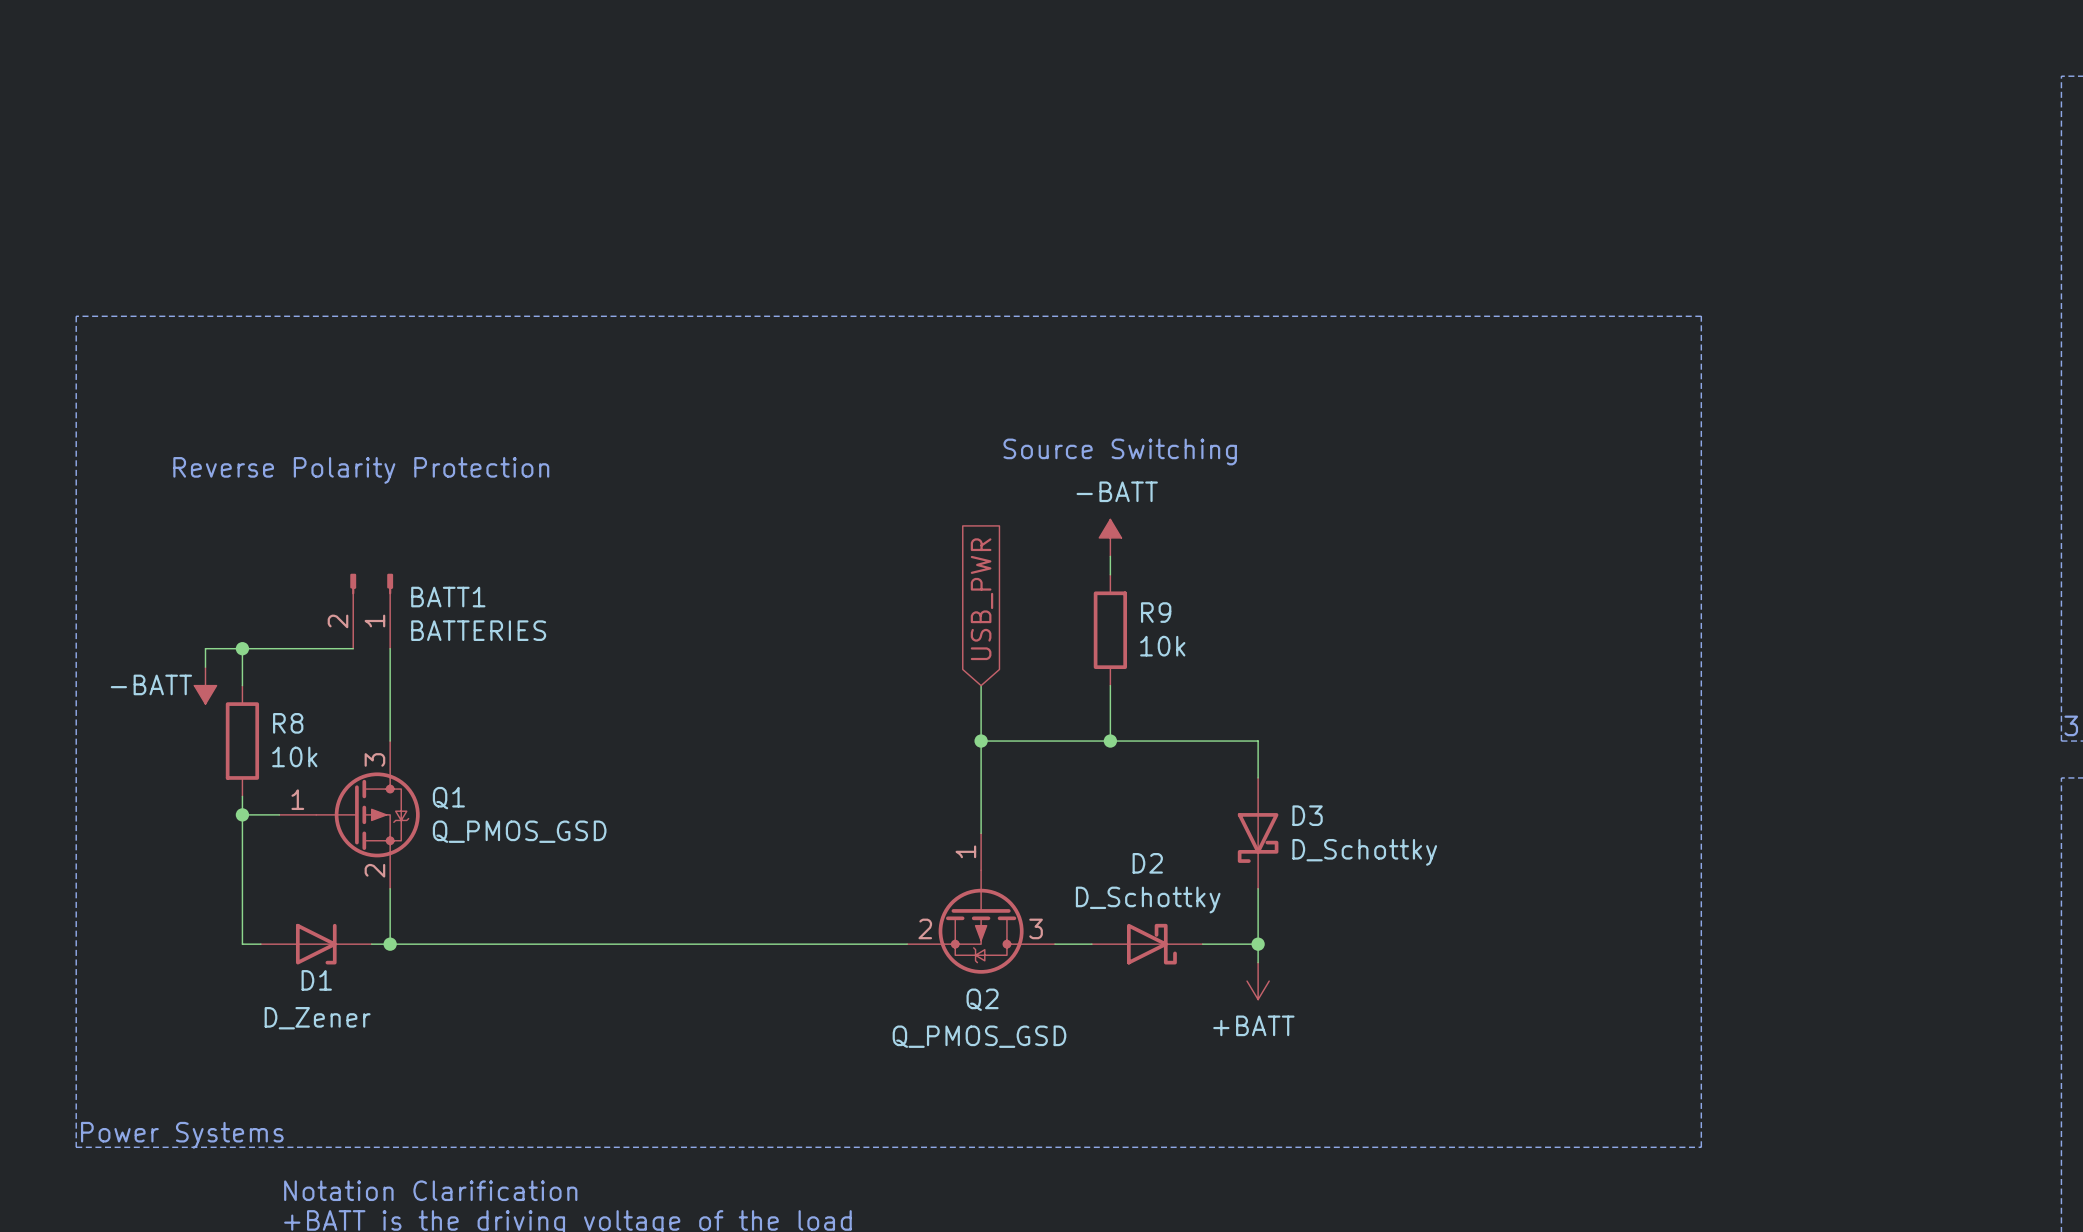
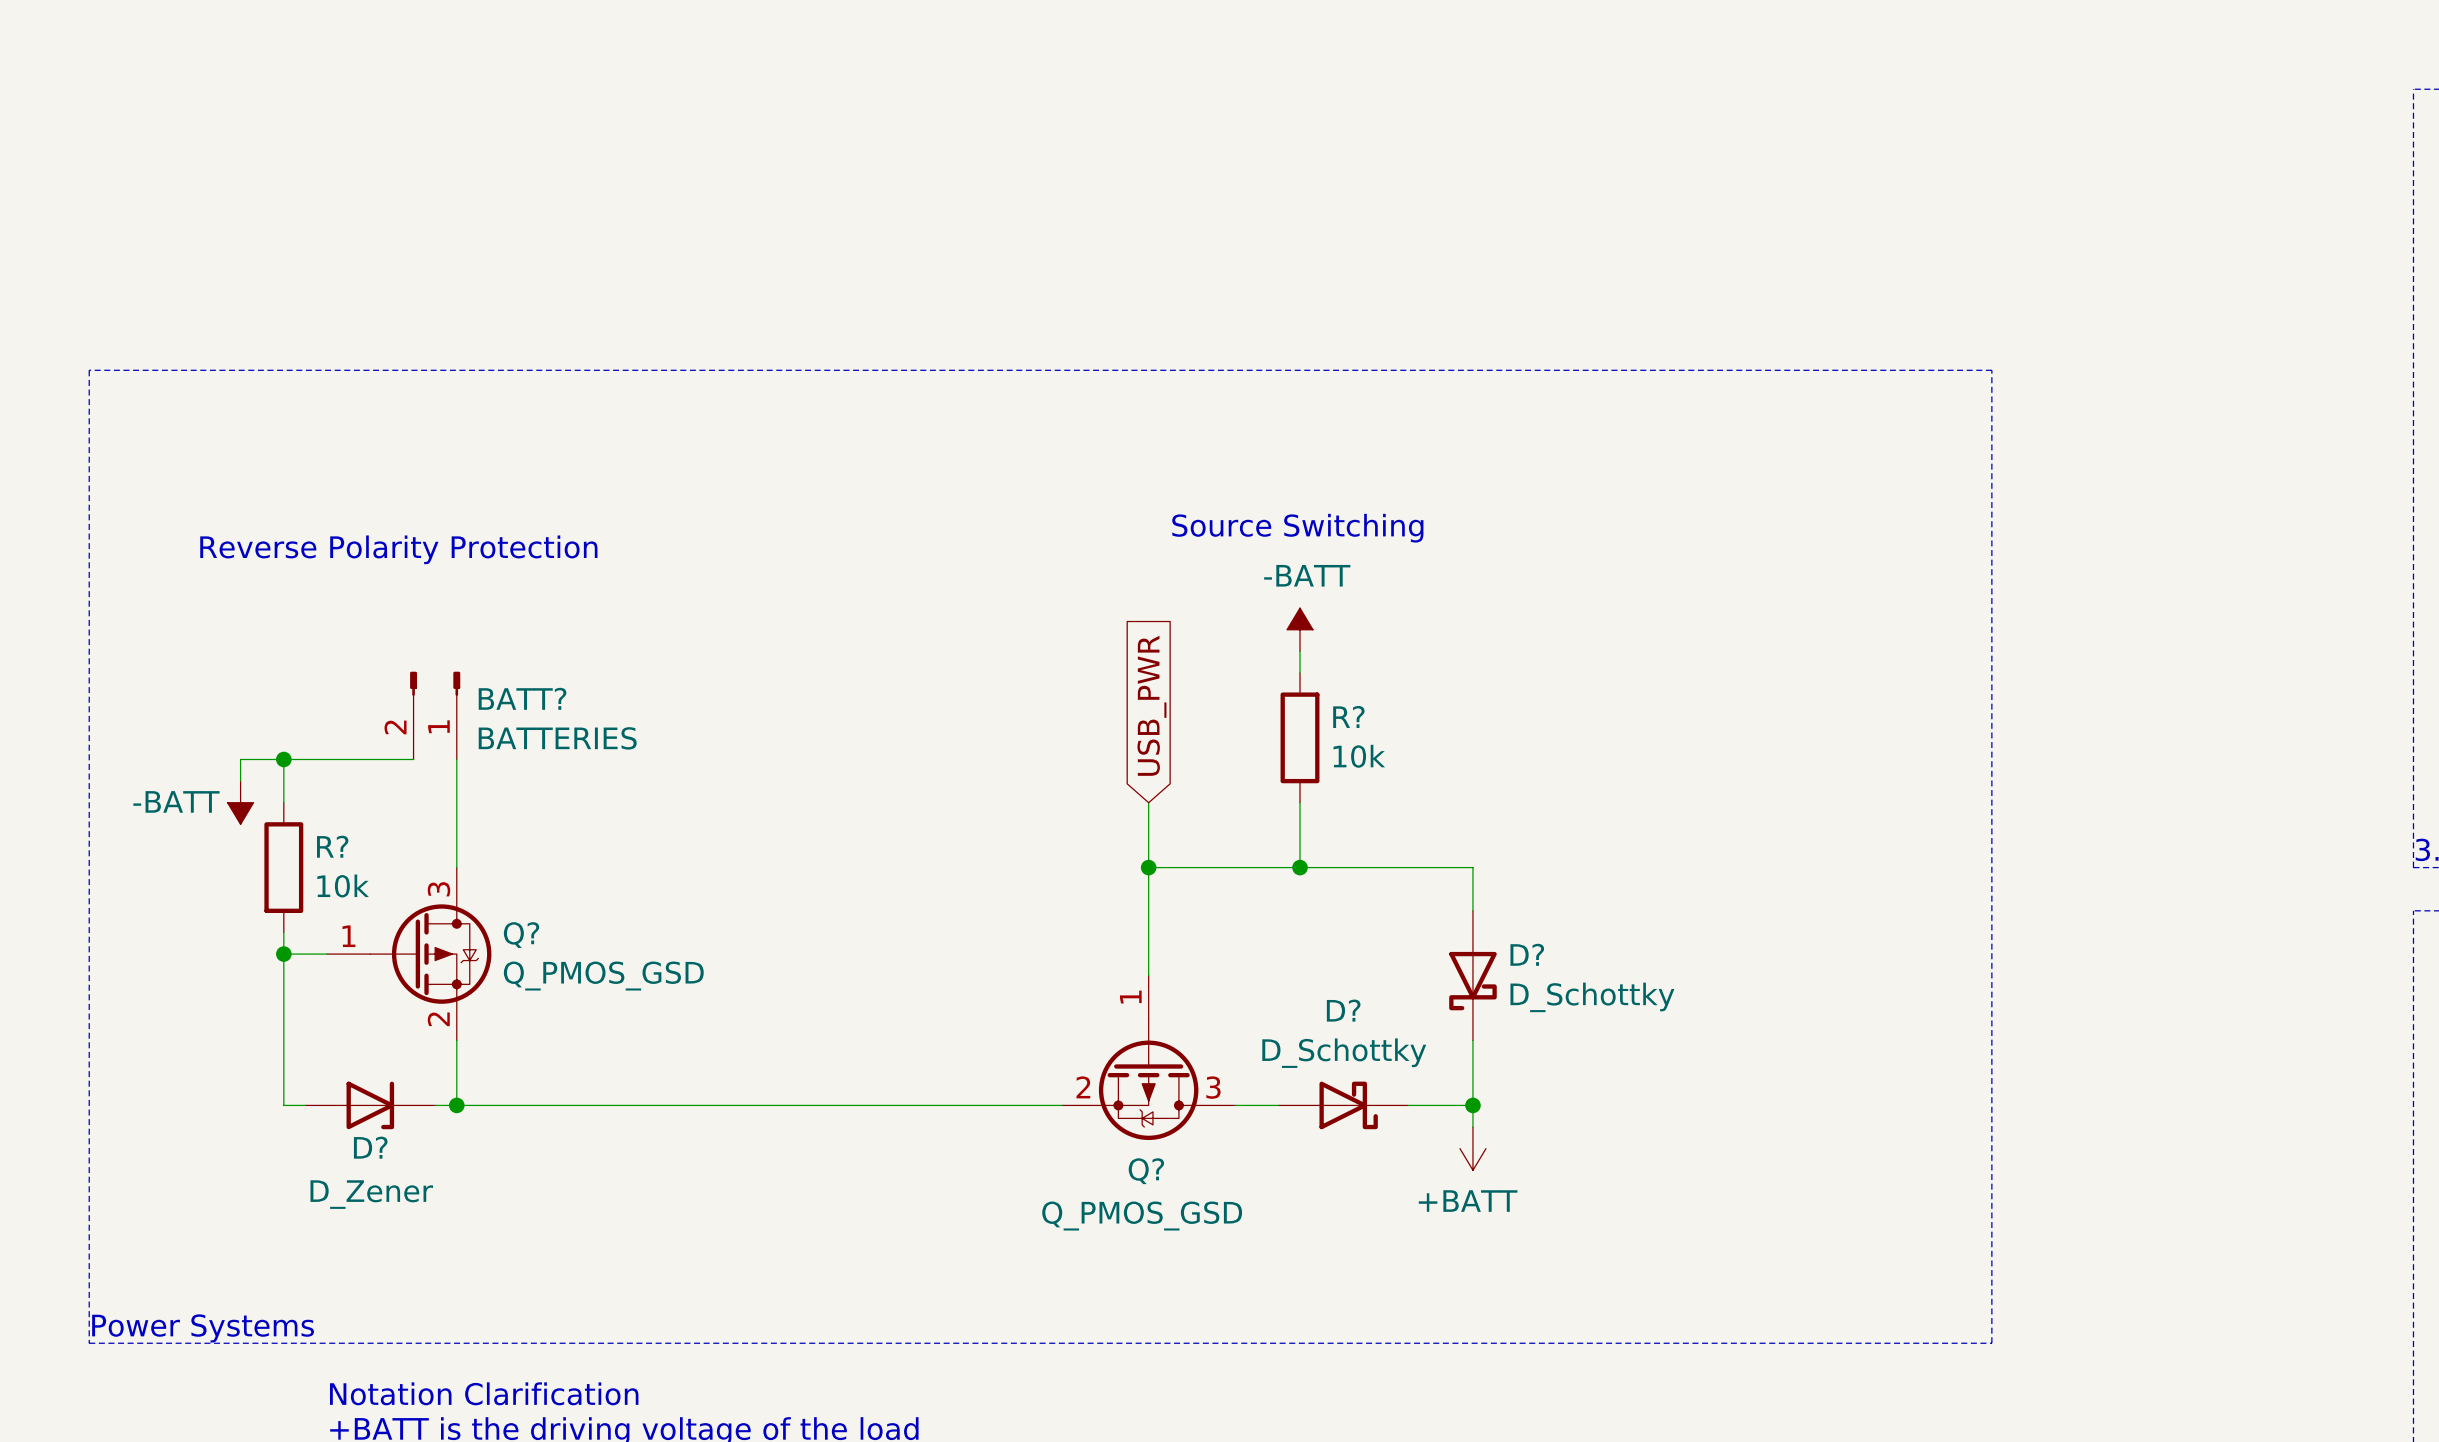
BATT1 name: BATT1 (448, 597) -> BATT? (522, 698)
R9 name: R9 (1156, 612) -> R? (1348, 716)
R8 name: R8 (288, 723) -> R? (332, 846)
Q1 name: Q1 (448, 798) -> Q? (521, 935)
D3 name: D3 (1307, 815) -> D? (1527, 954)
D2 name: D2 (1147, 863) -> D? (1343, 1010)
D1 name: D1 (316, 980) -> D? (370, 1147)
Q2 name: Q2 (982, 999) -> Q? (1146, 1171)

